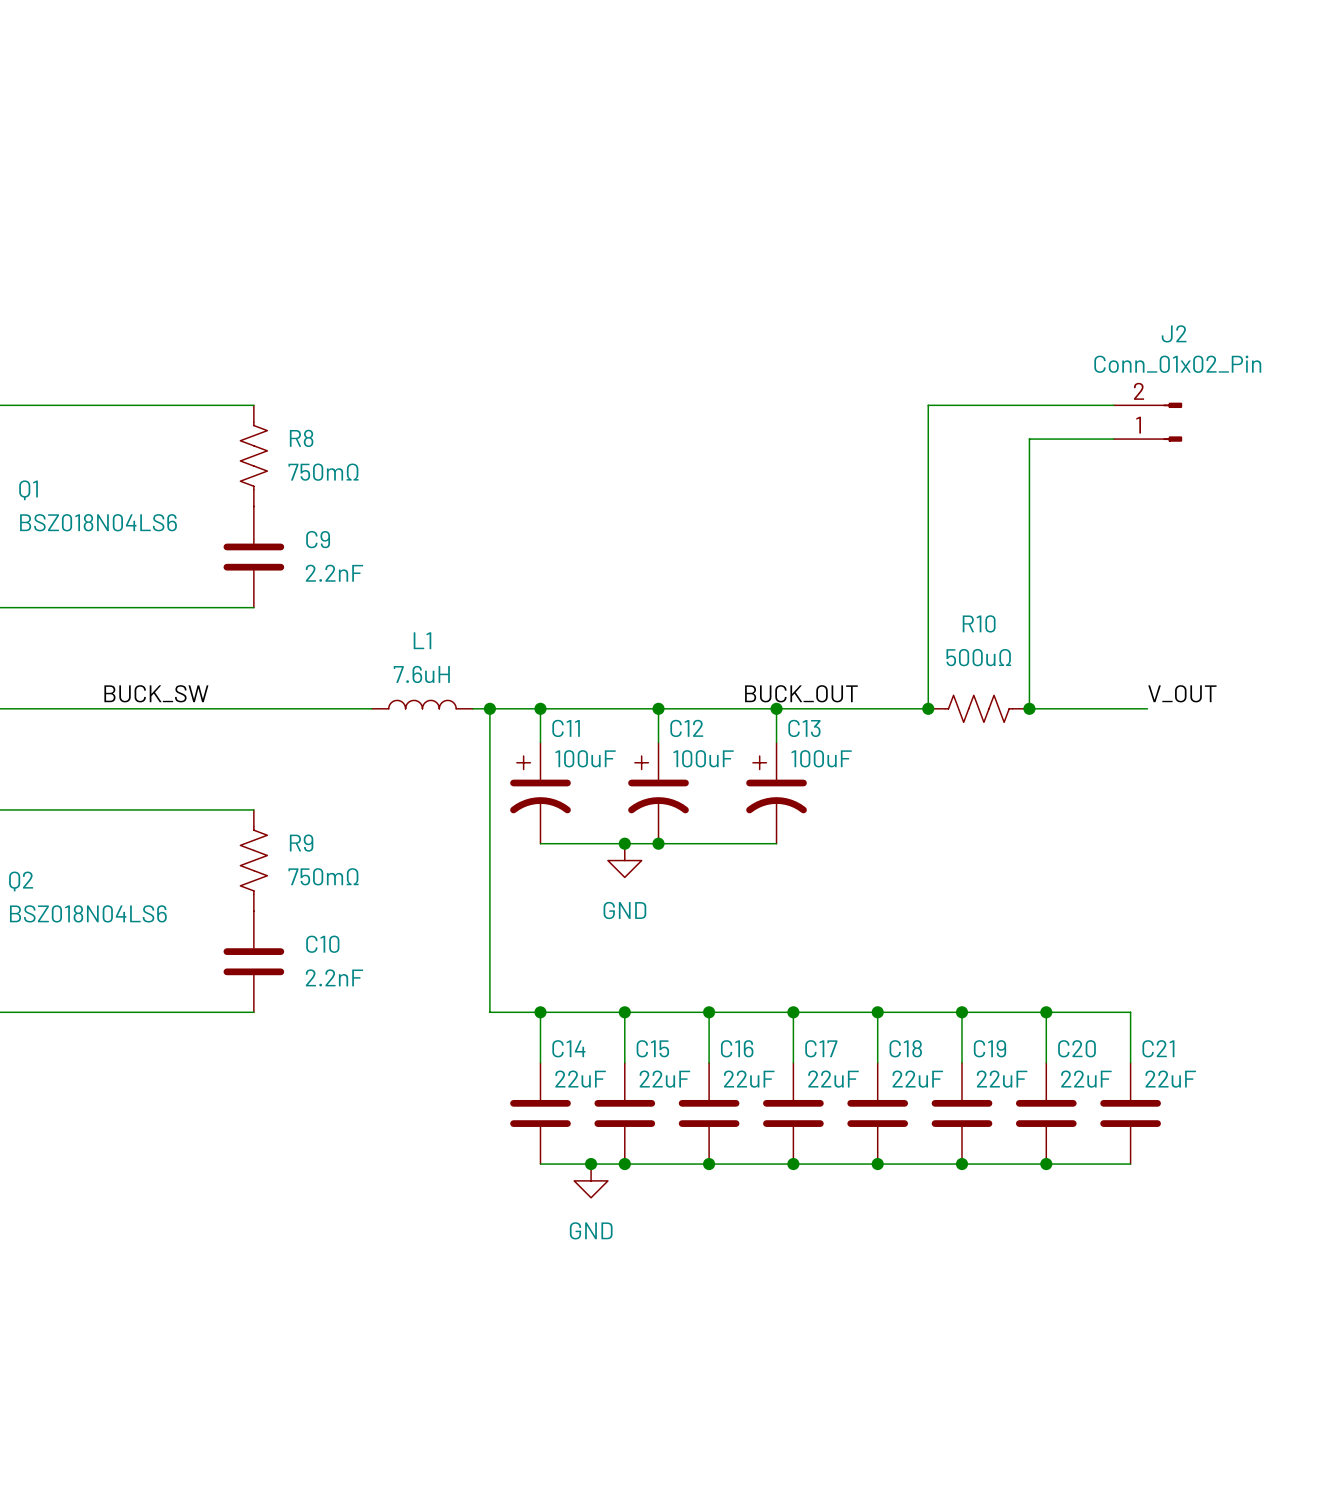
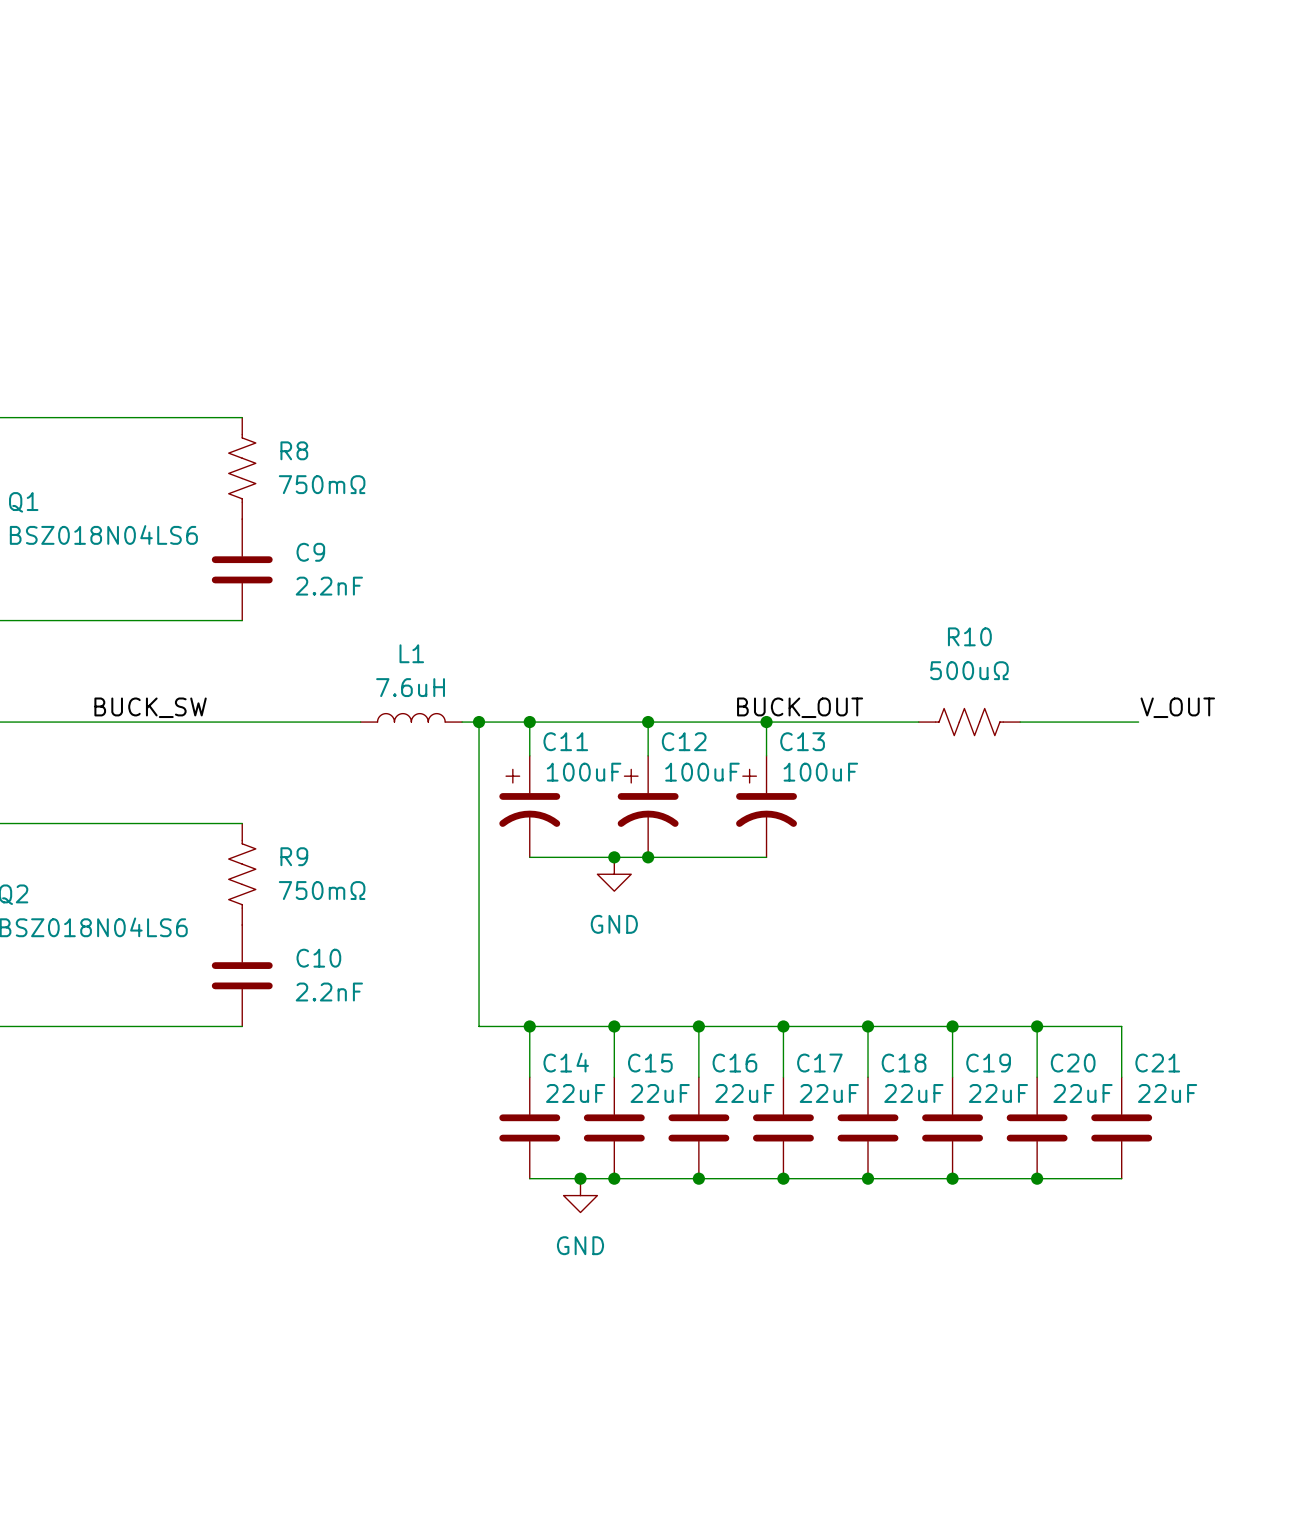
wire: (1113, 405) (928, 405) (928, 708) -> none
J2: Conn_01x02_Pin (1147, 422) -> none
wire: (1113, 439) (1029, 439) (1029, 708) -> none
junction: (928, 708) -> none
junction: (1029, 708) -> none

